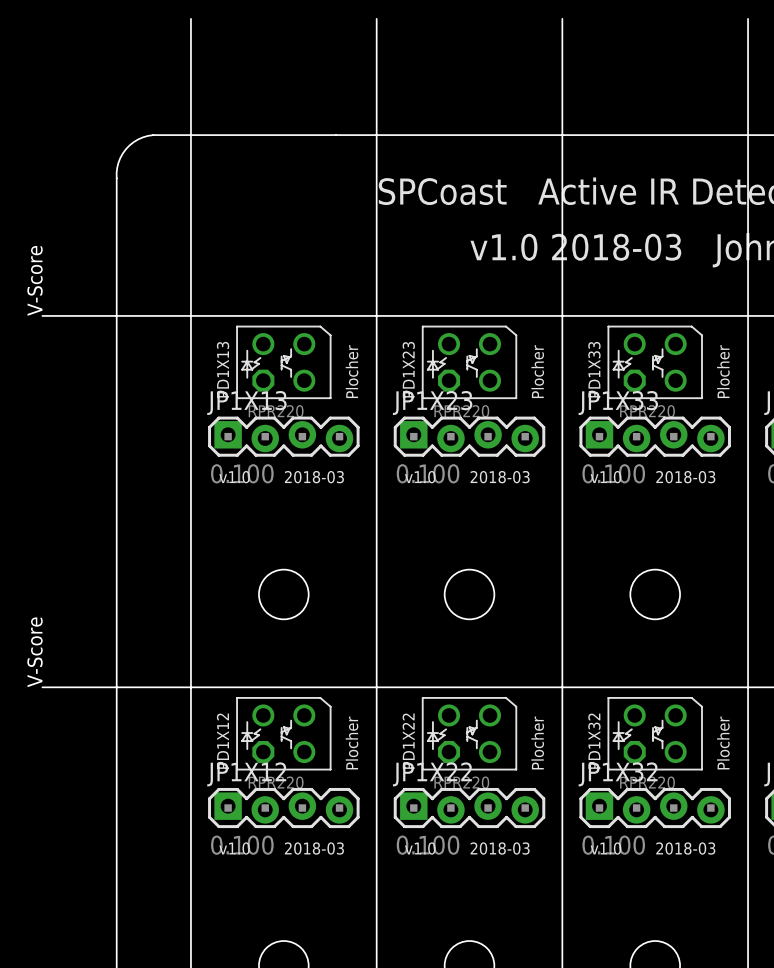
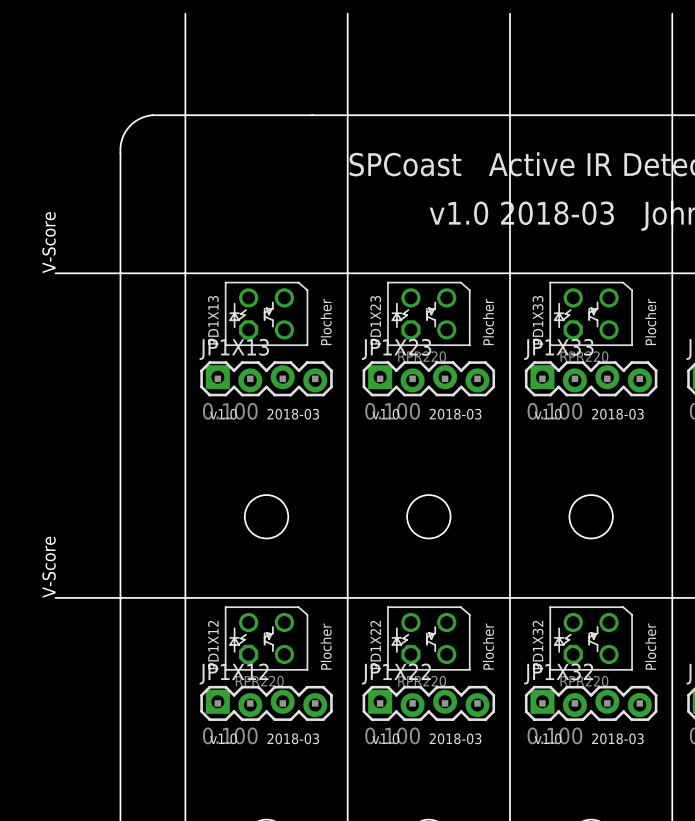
PD1X13 value: RPR220 (276, 411) -> none

